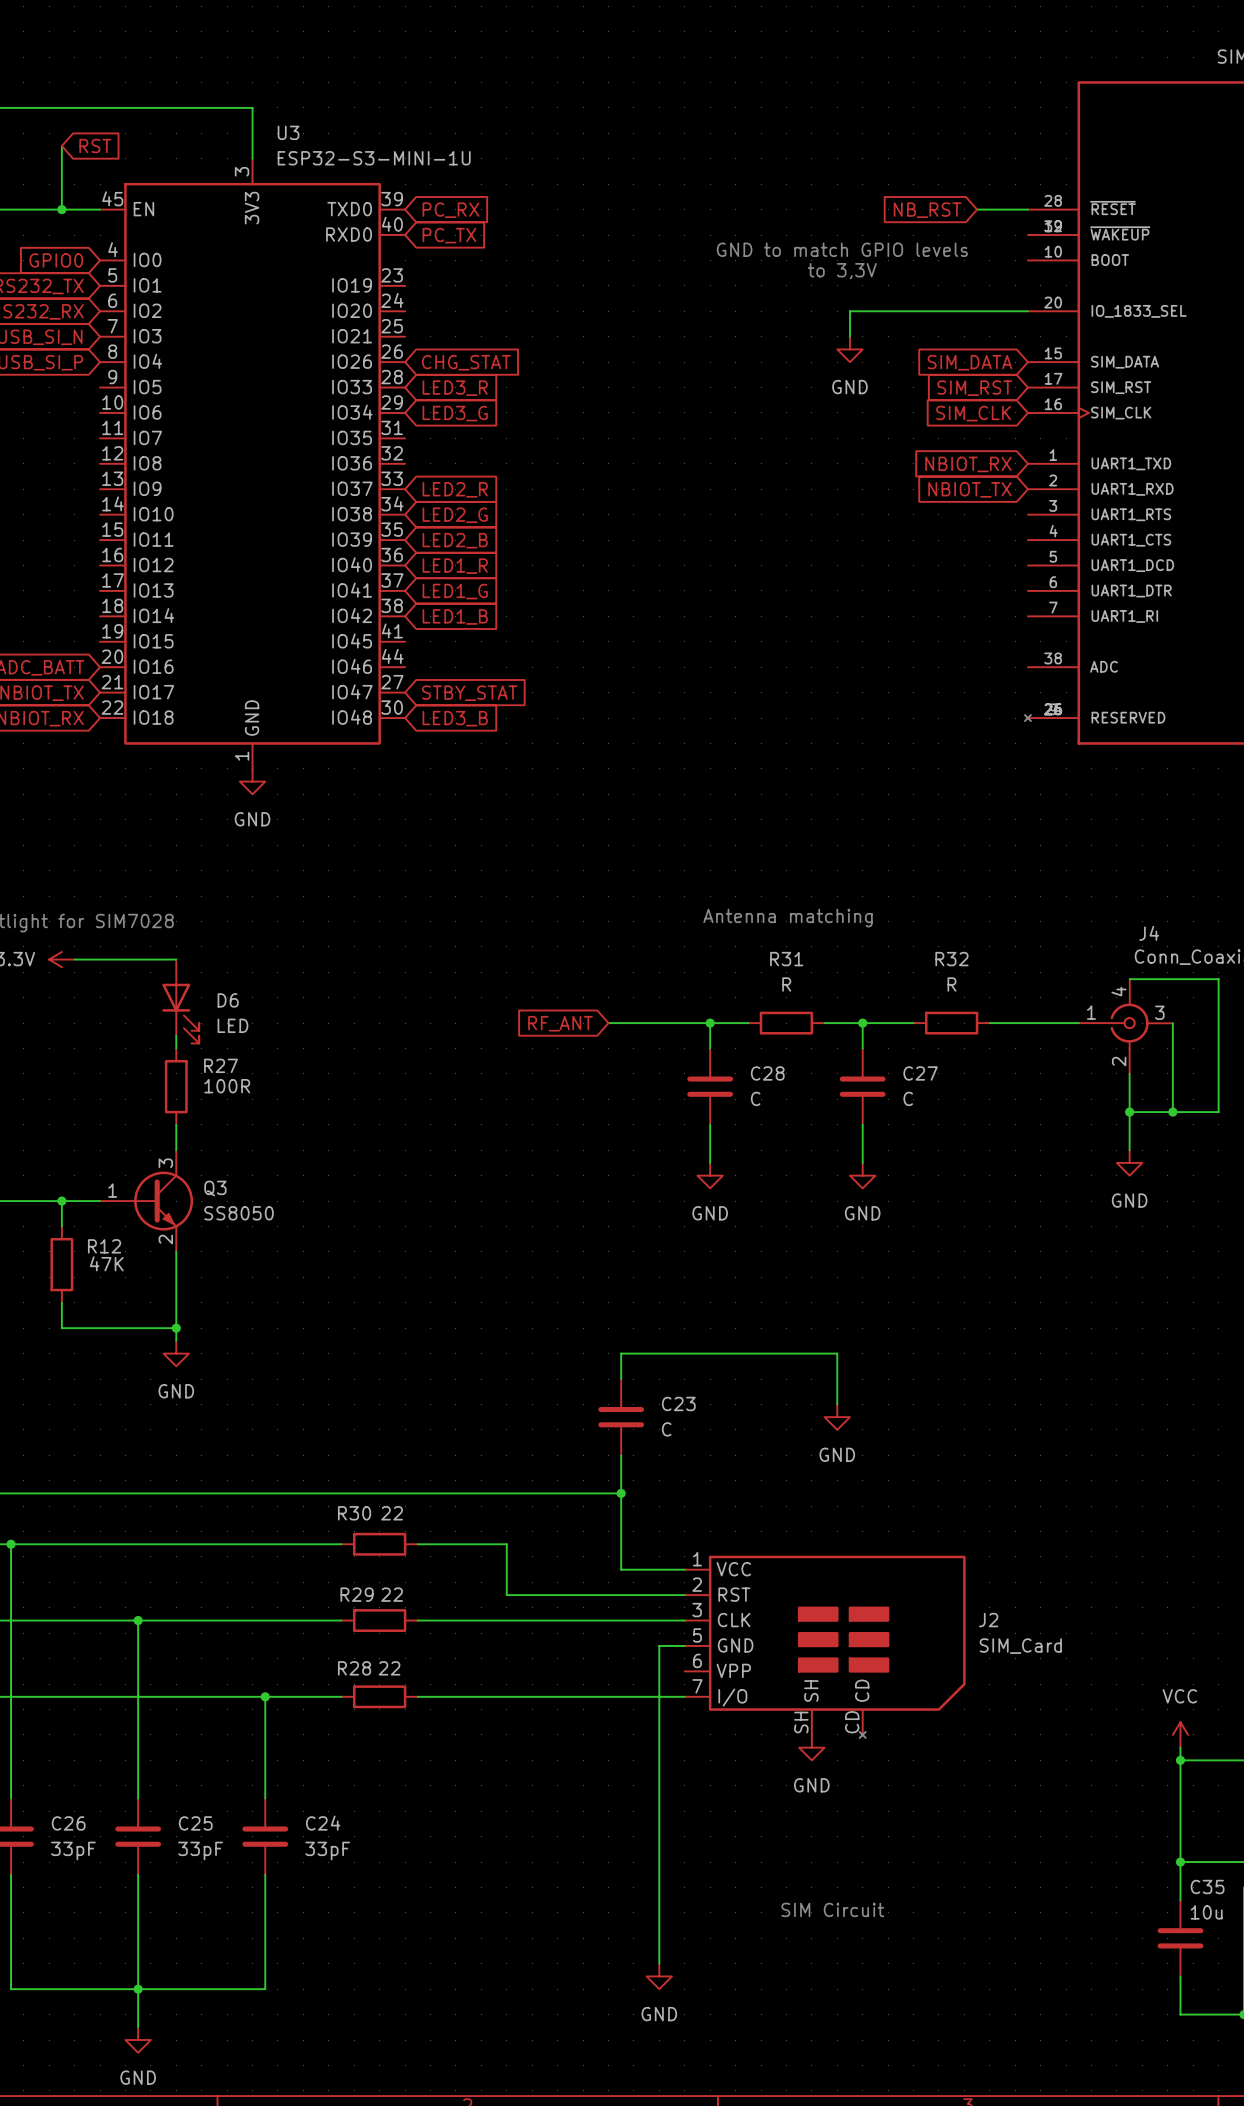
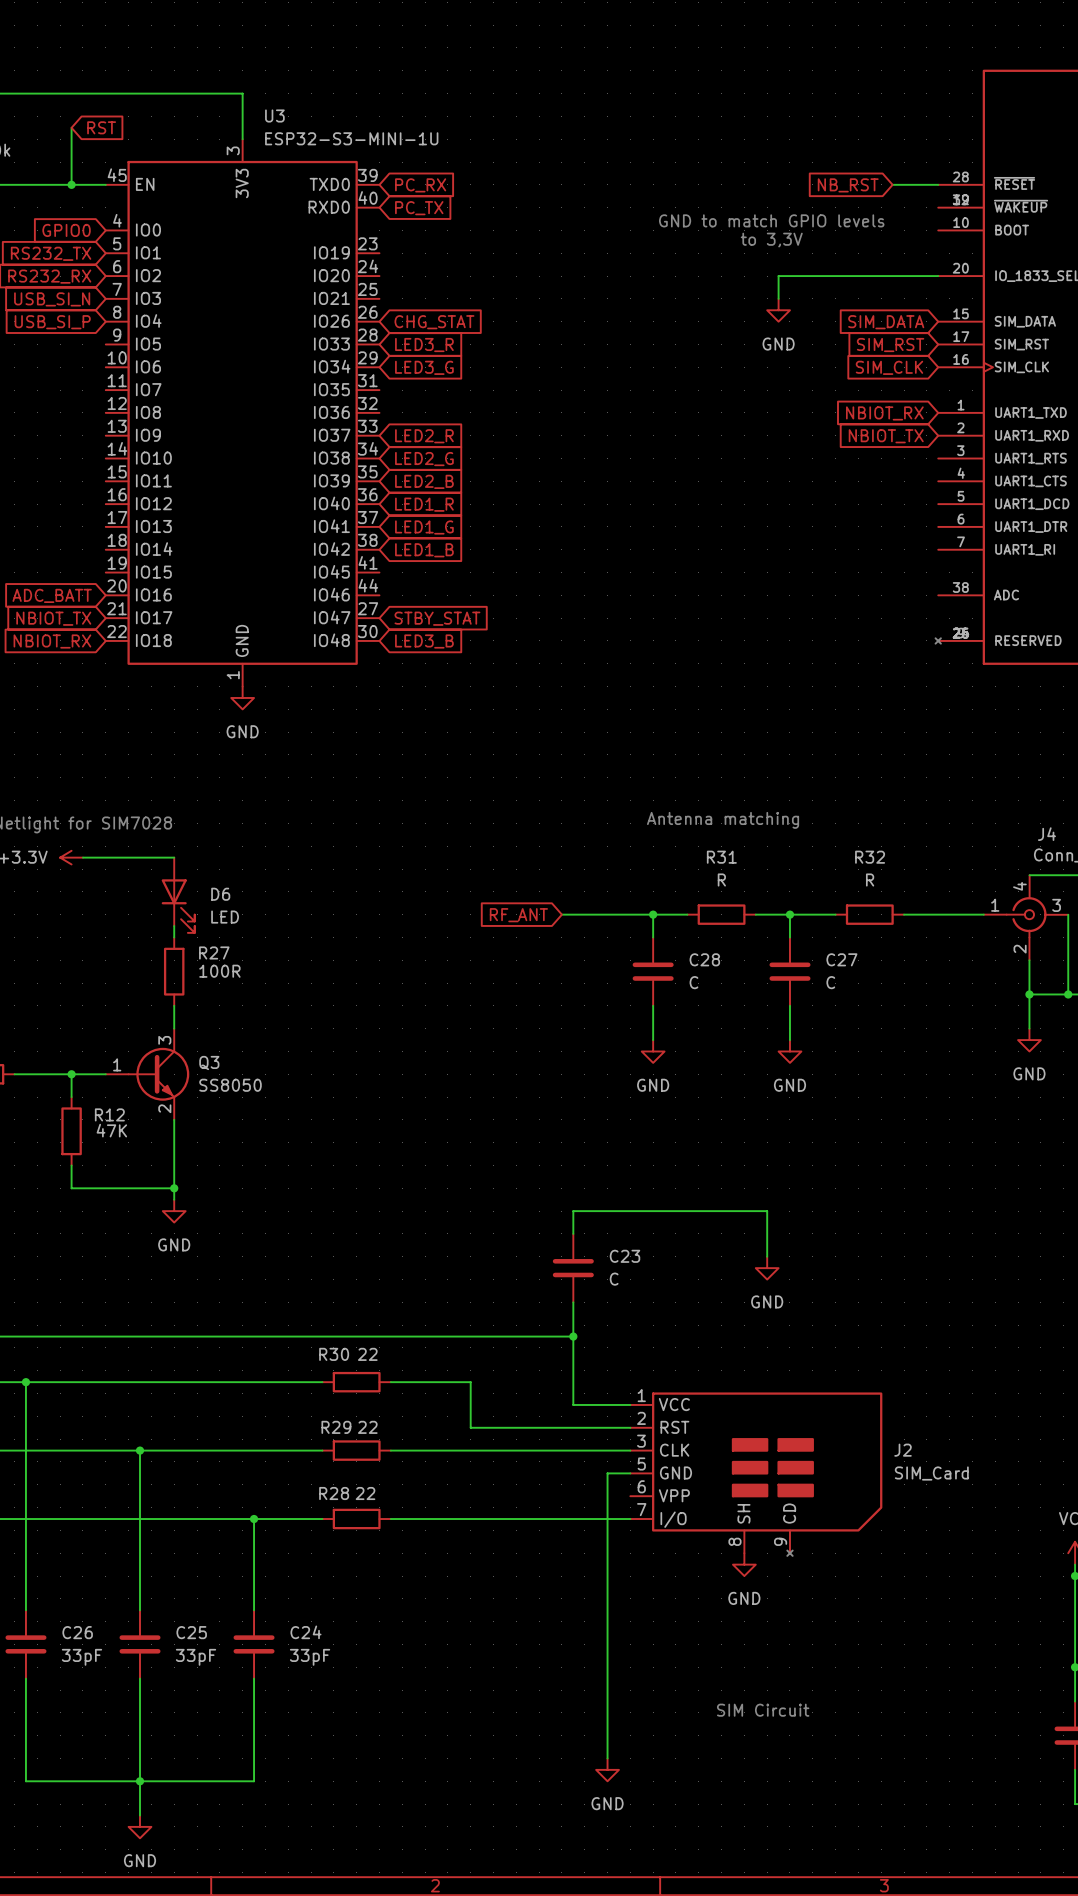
J2 pin number: SH (801, 1722) -> 8 (734, 1541)
J2 pin number: CD (852, 1722) -> 9 (780, 1541)

